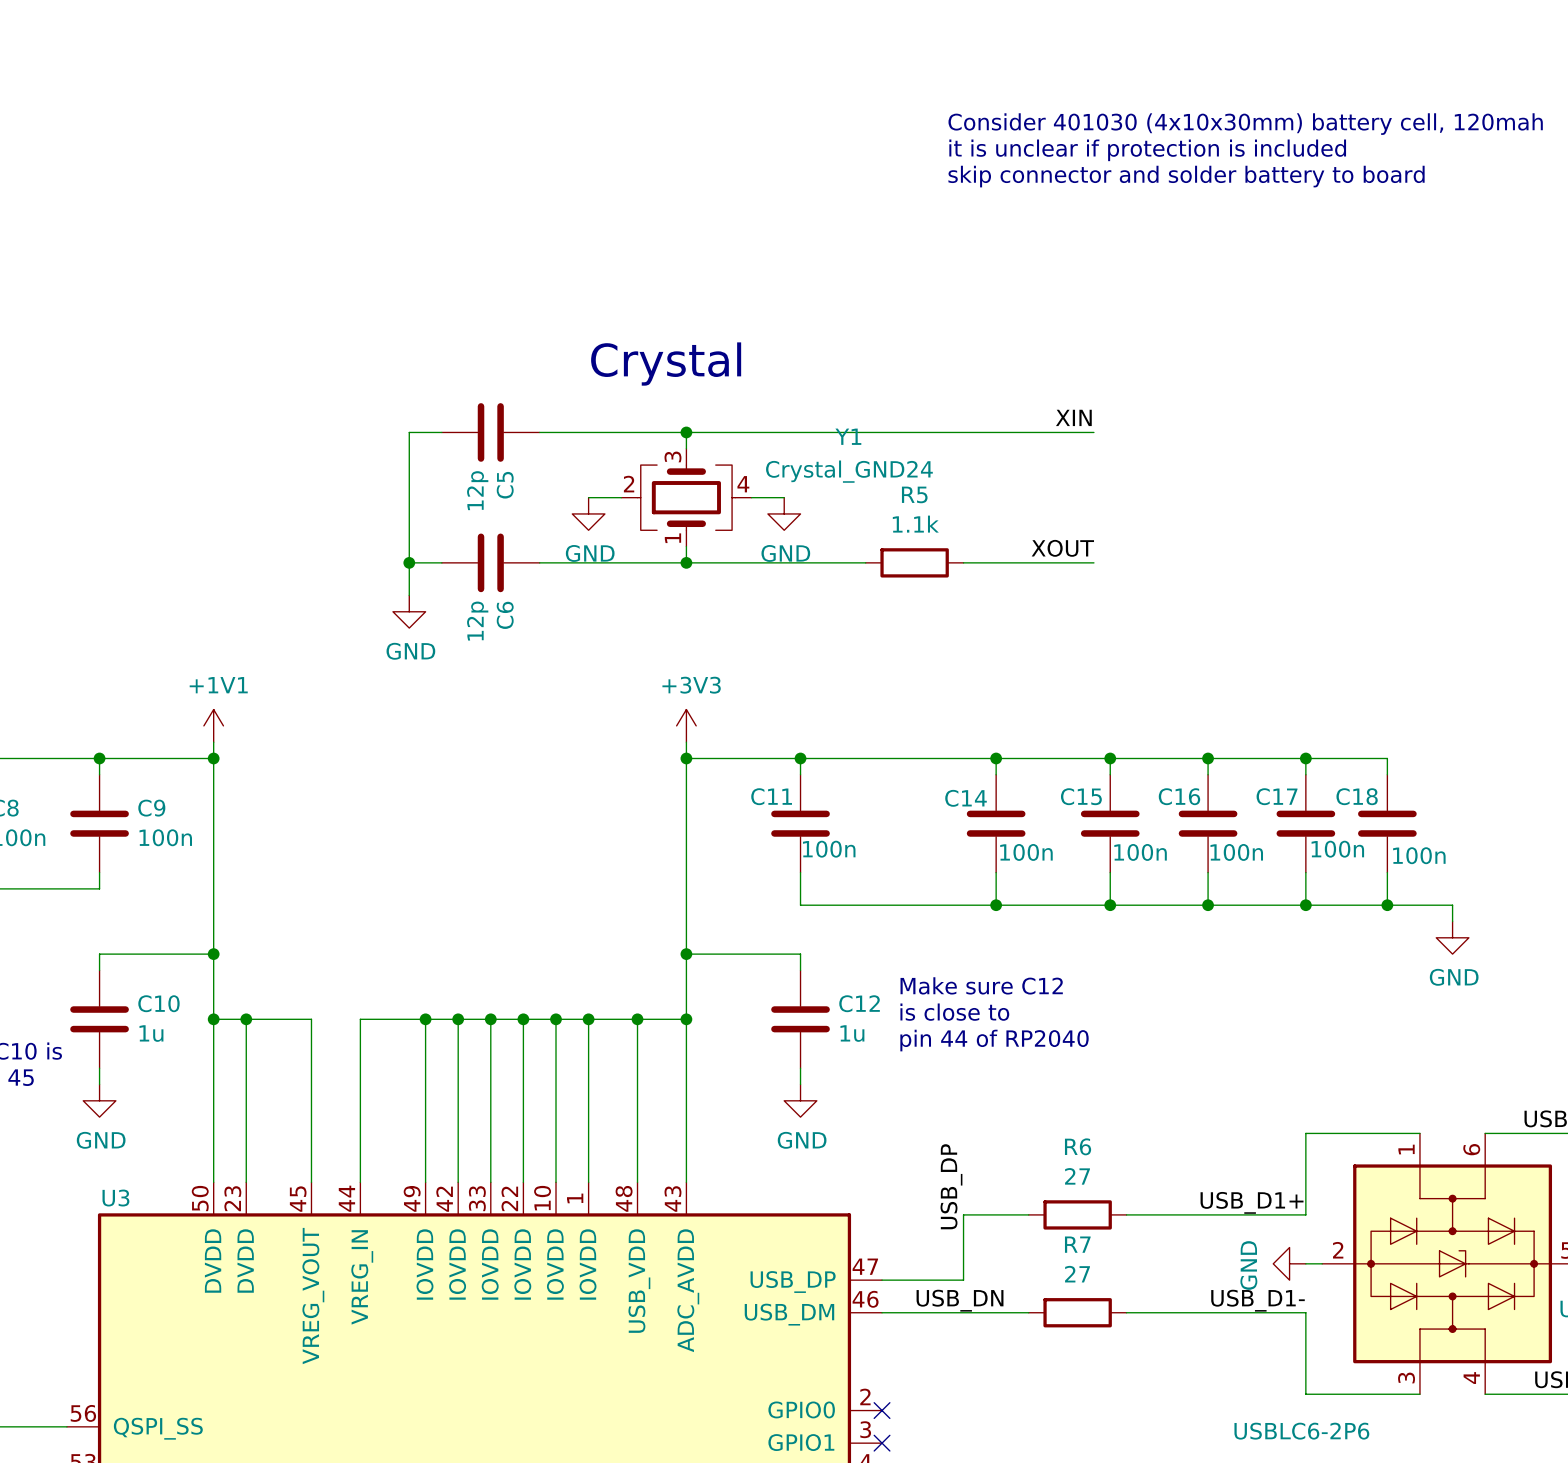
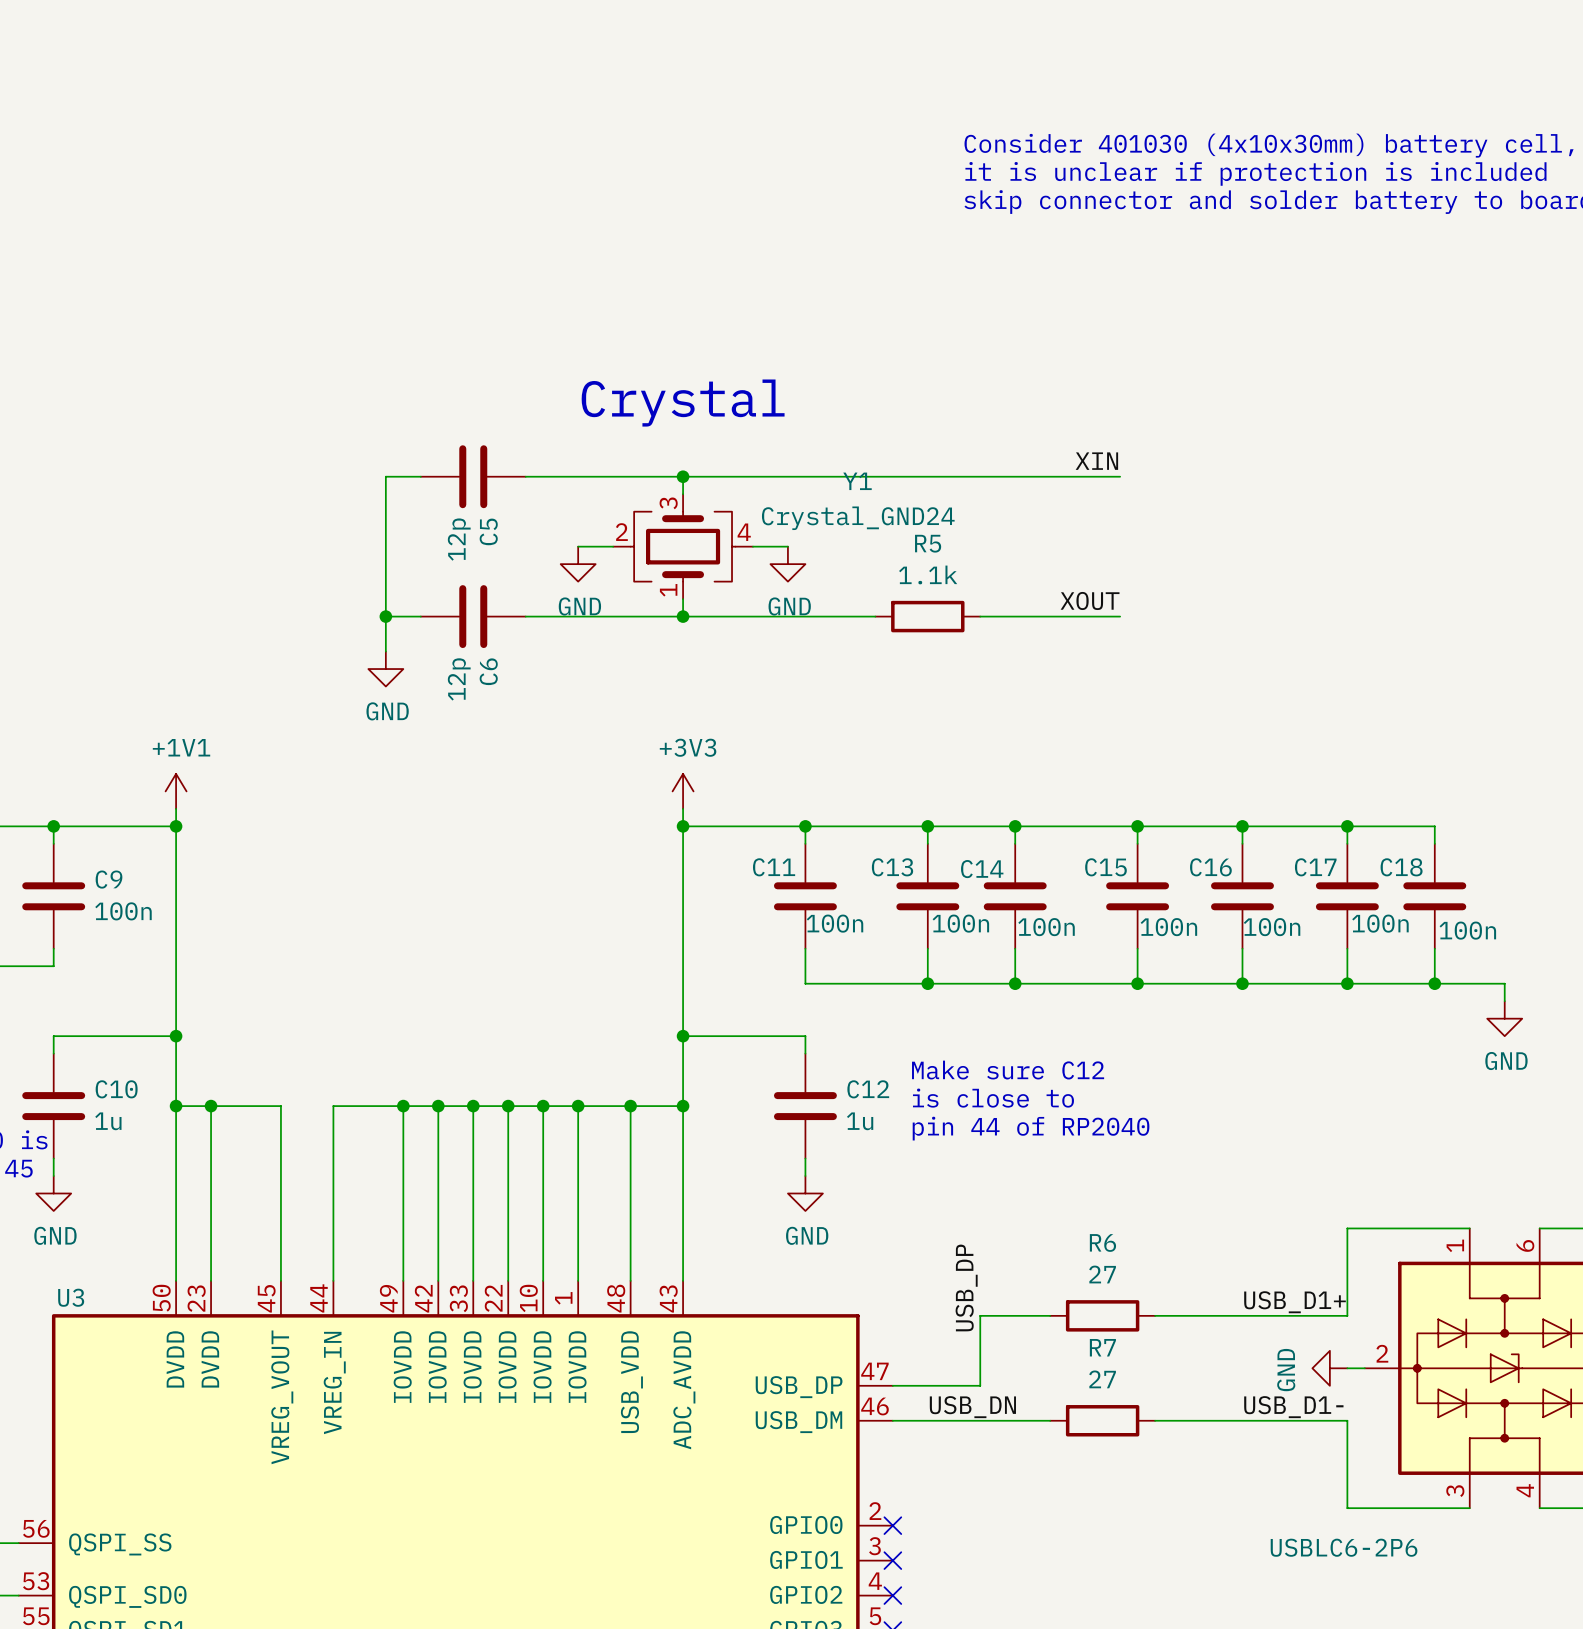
wire: none -> (927, 826) (927, 843)
junction: none -> (927, 826)
C13: none -> 100n (927, 896)
wire: none -> (927, 948) (927, 983)
junction: none -> (927, 983)

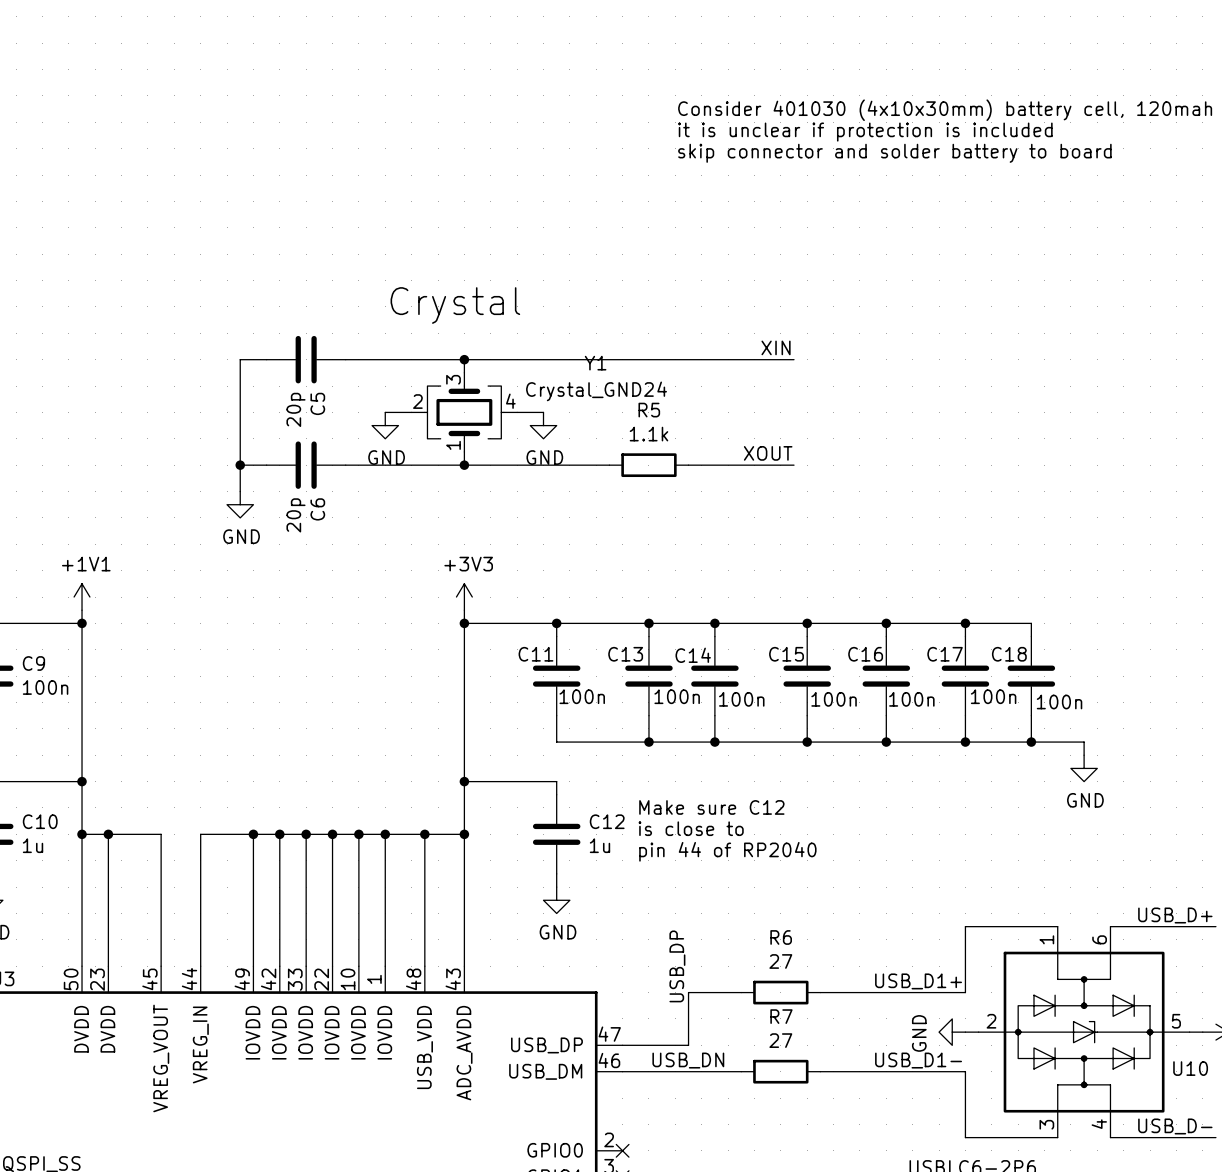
C5 value: 12p (459, 539) -> 20p (296, 409)
C6 value: 12p (459, 679) -> 20p (296, 515)

